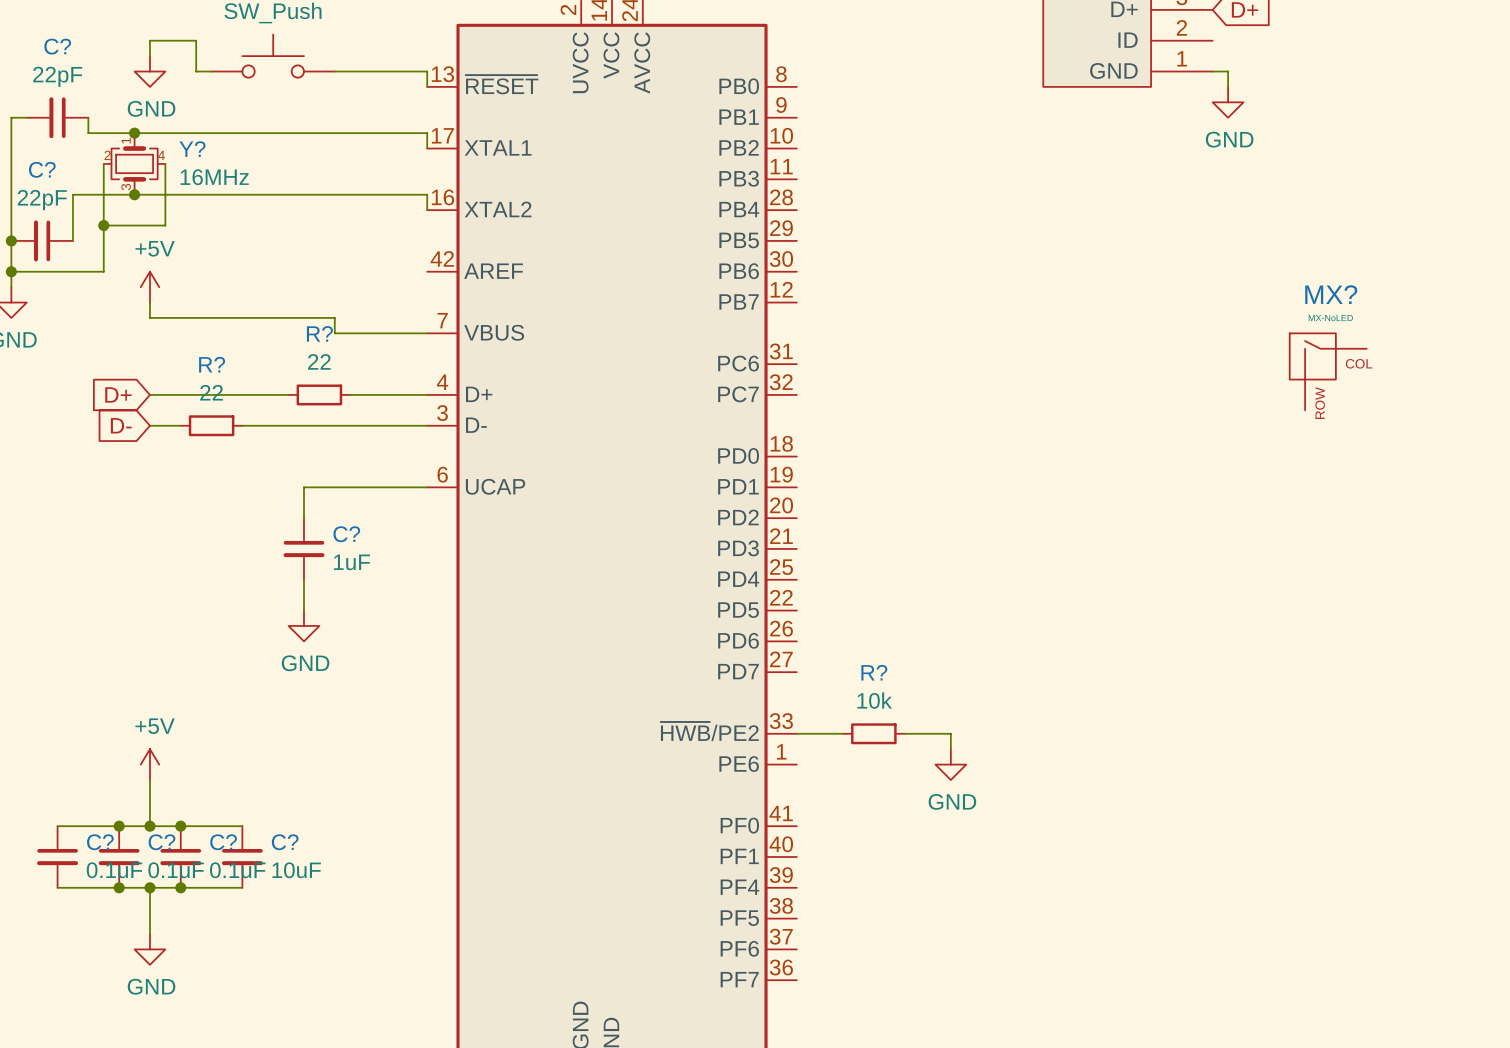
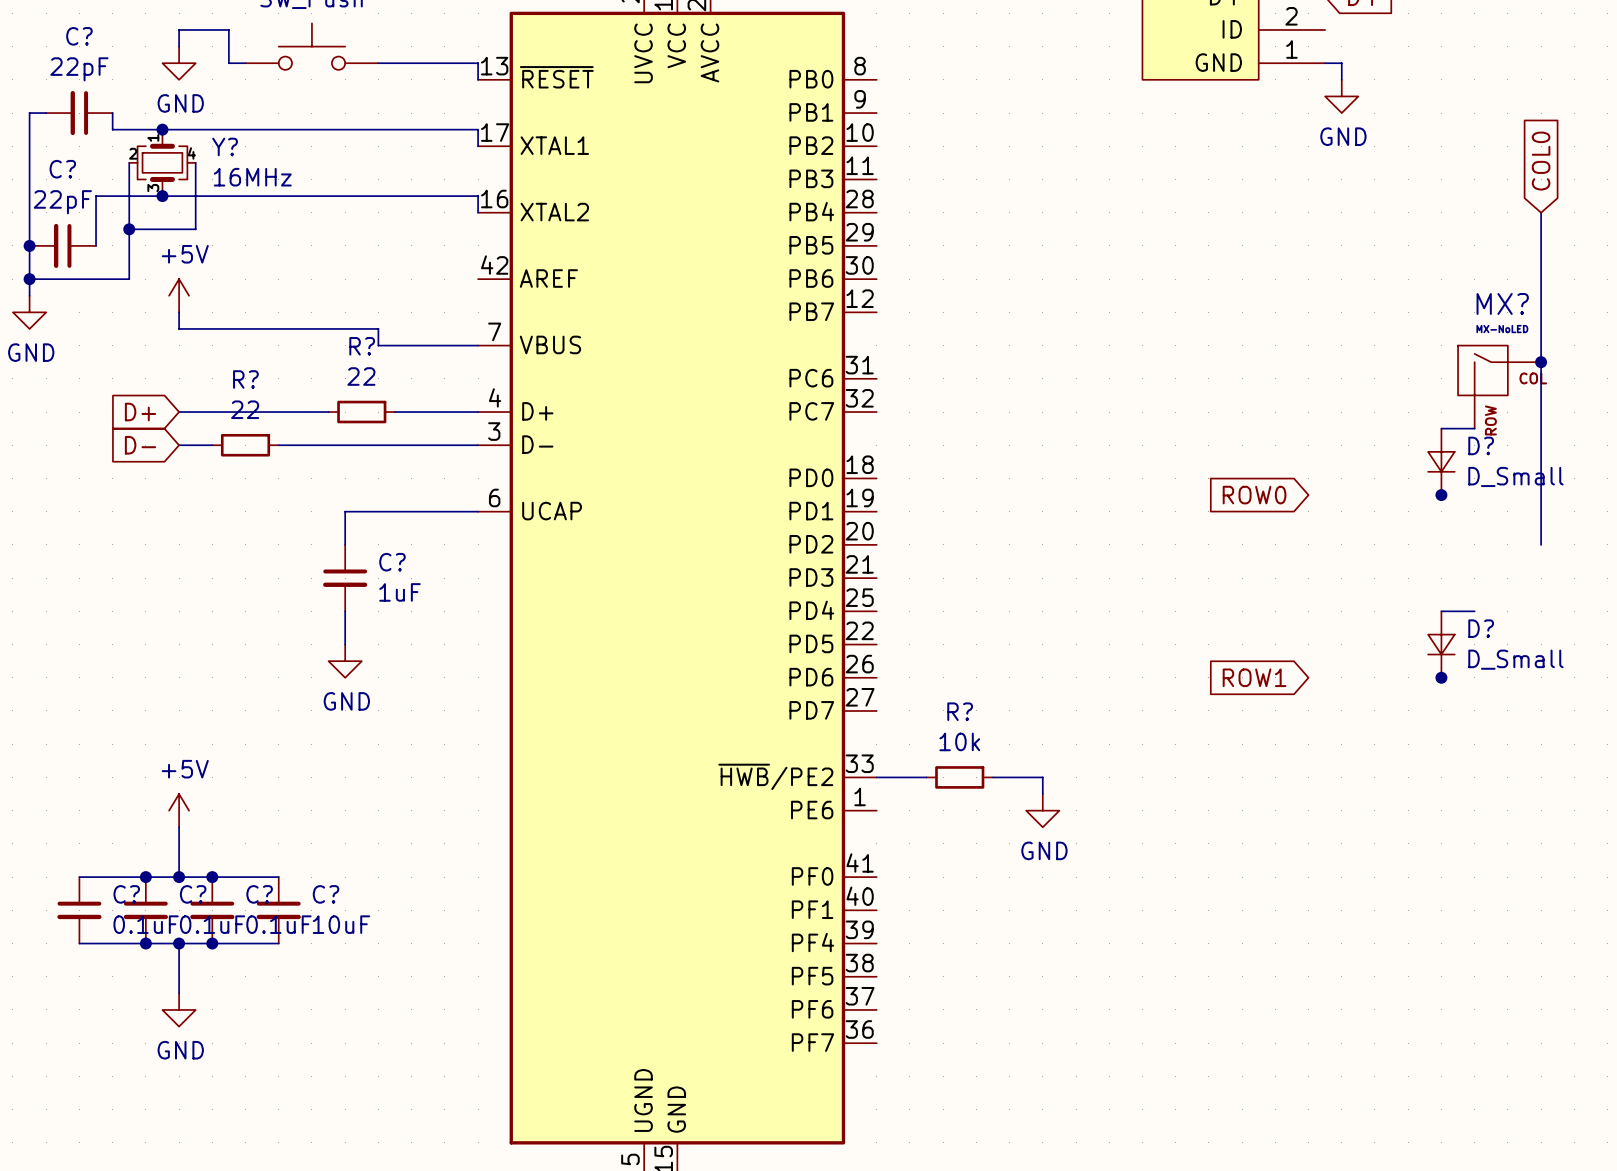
global label: none -> COL0 (1541, 161)
wire: none -> (1541, 212) (1541, 544)
junction: none -> (1541, 362)
MX? position: (1328, 371) -> (1499, 387)
wire: none -> (1441, 428) (1474, 428)
D?: none -> D_Small (1441, 461)
global label: none -> ROW0 (1254, 495)
junction: none -> (1441, 495)
wire: none -> (1441, 611) (1474, 611)
D?: none -> D_Small (1441, 644)
global label: none -> ROW1 (1254, 677)
junction: none -> (1441, 677)

